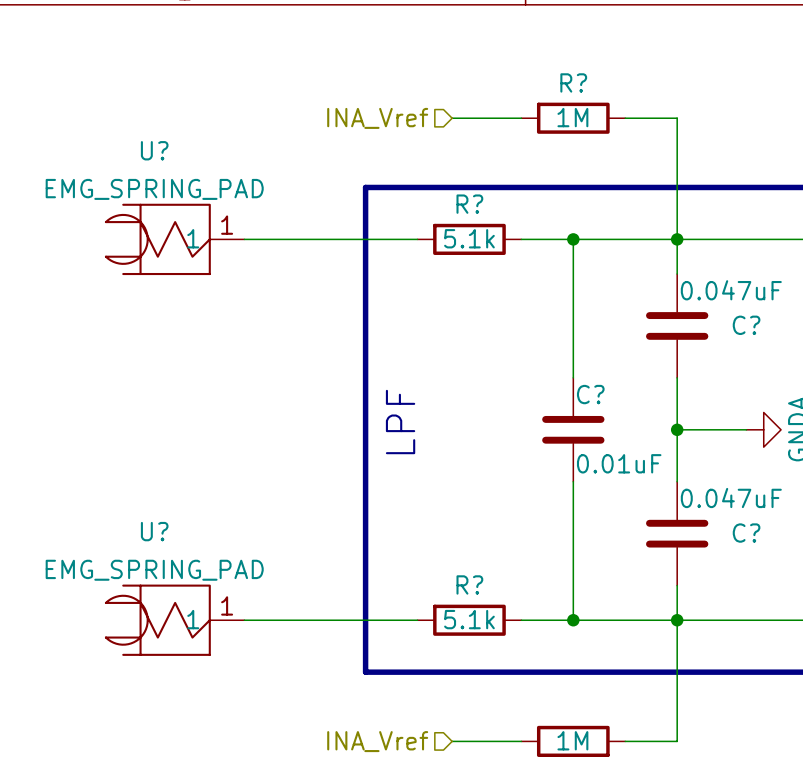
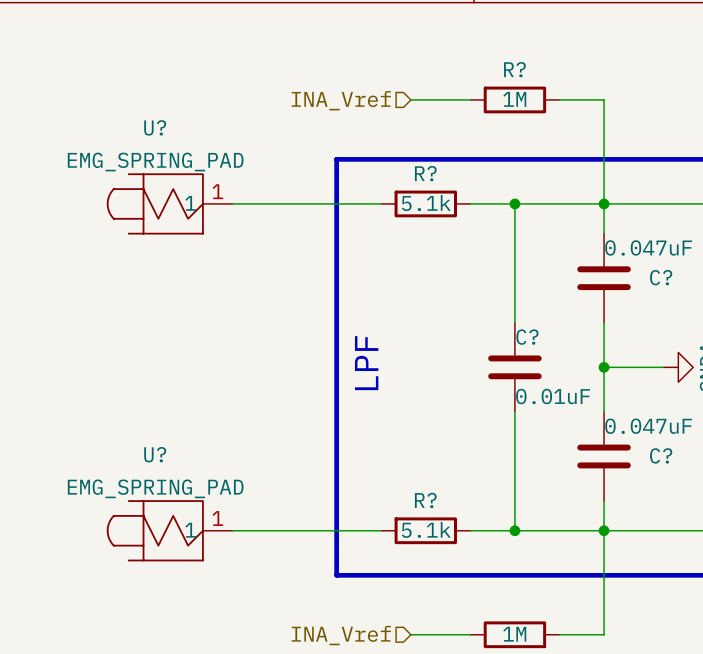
U? symbol: [104, 203, 245, 276] -> [106, 173, 233, 235]
U? symbol: [104, 584, 245, 656] -> [106, 500, 233, 562]

